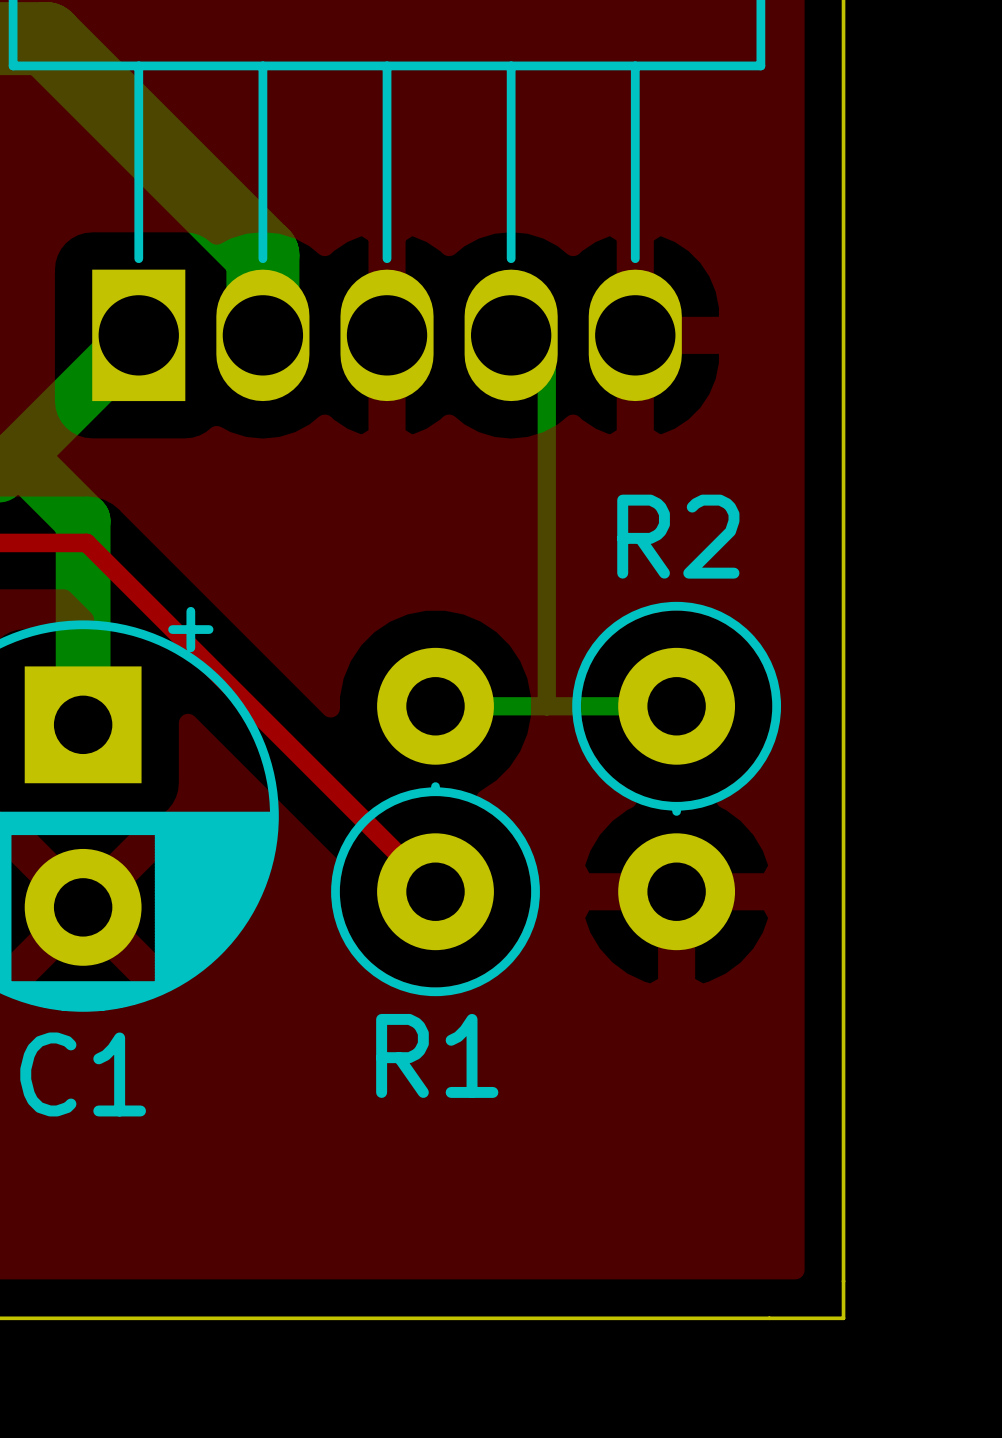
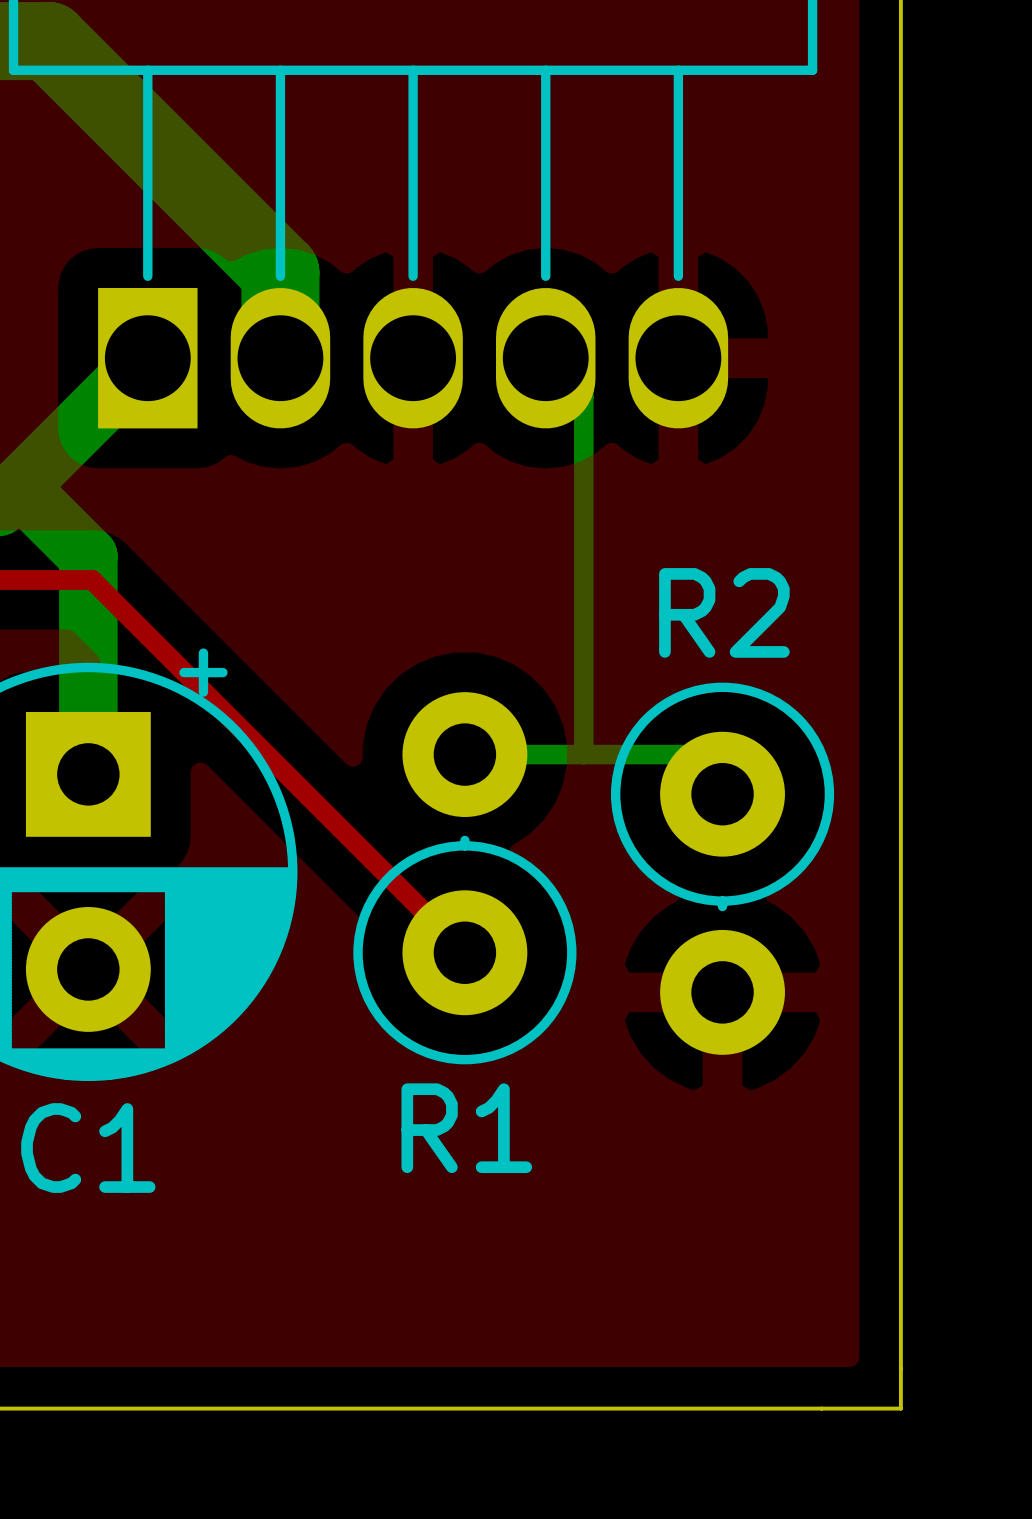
R2 position: (676, 776) -> (722, 868)

